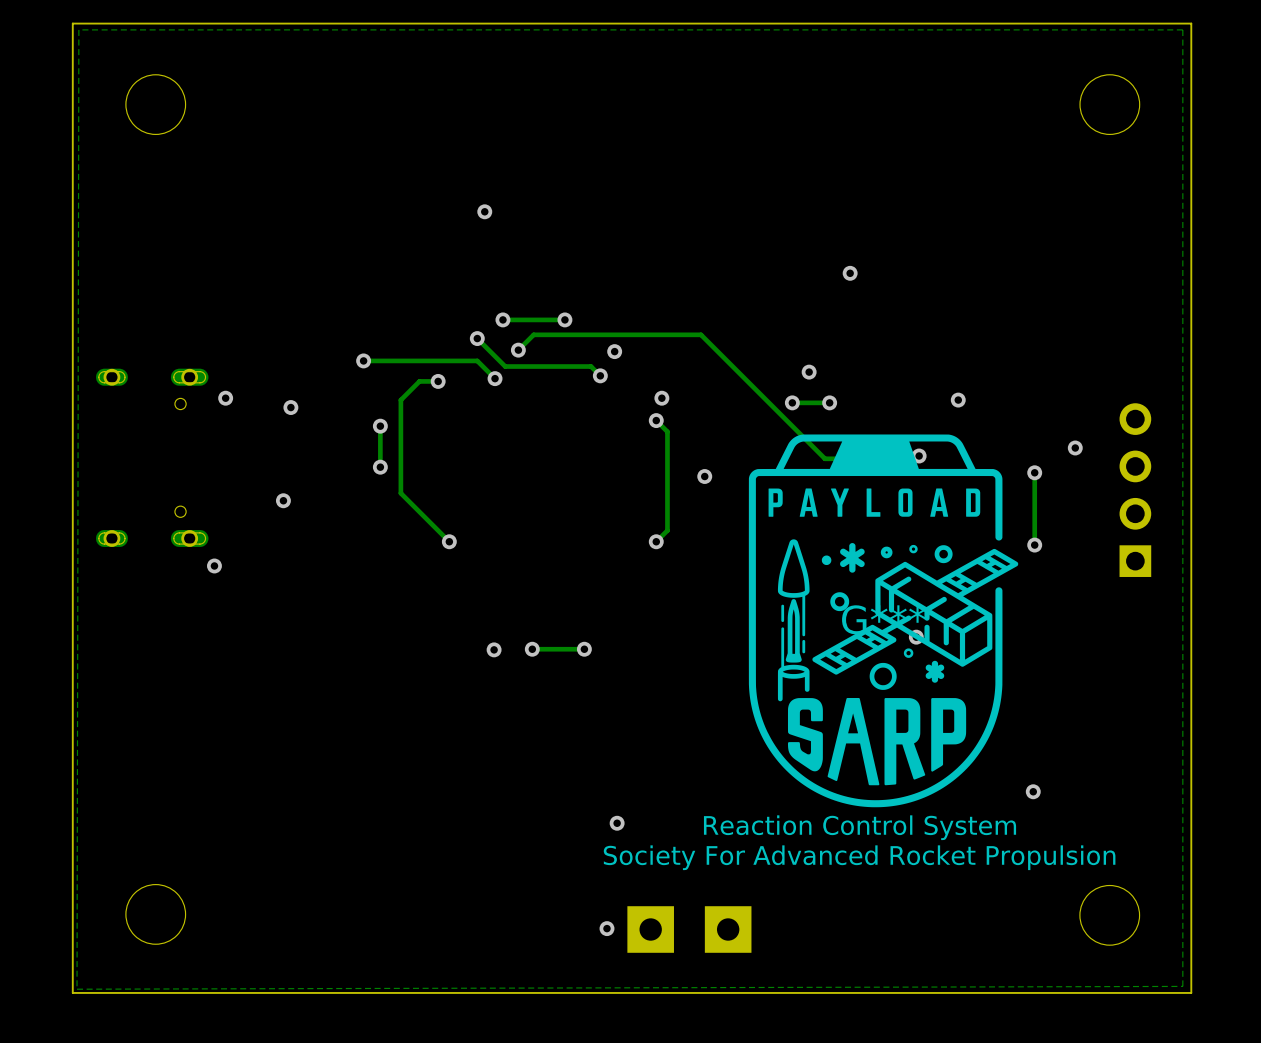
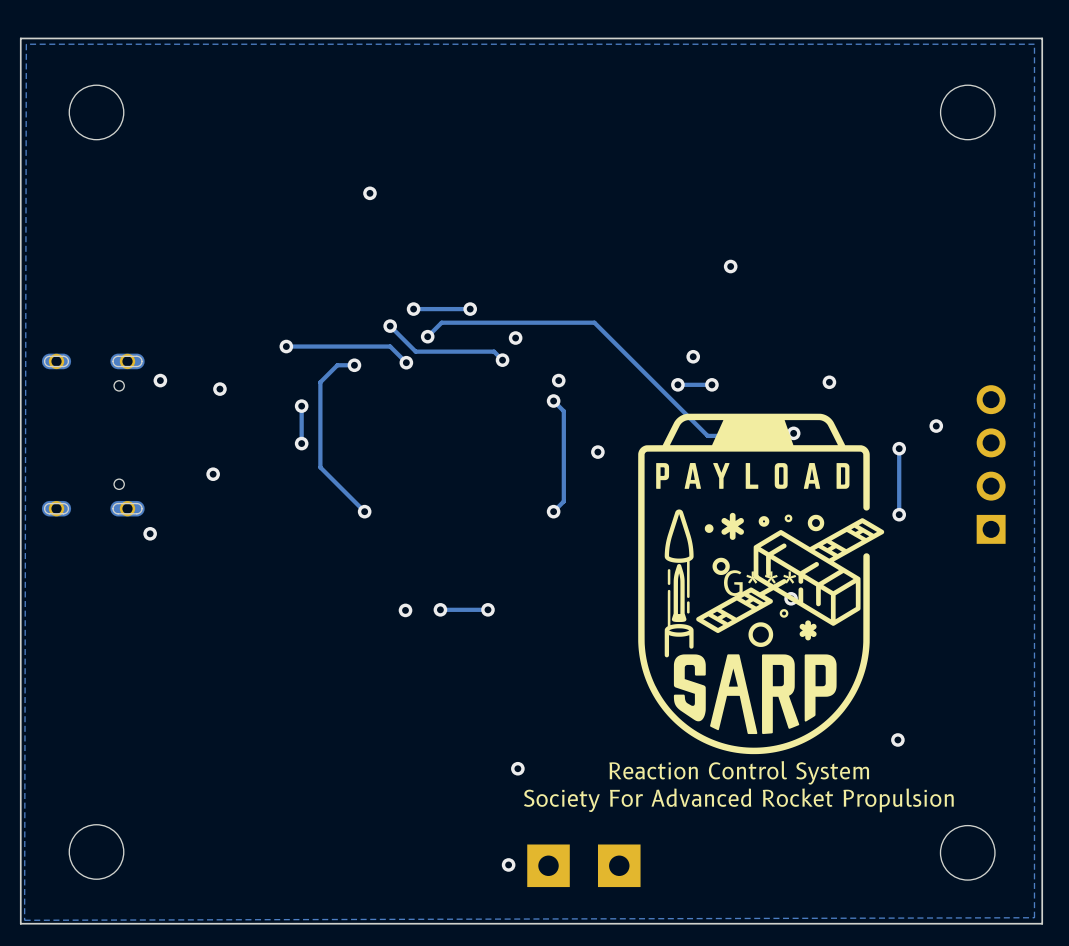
via position: (484, 211) -> (369, 193)

